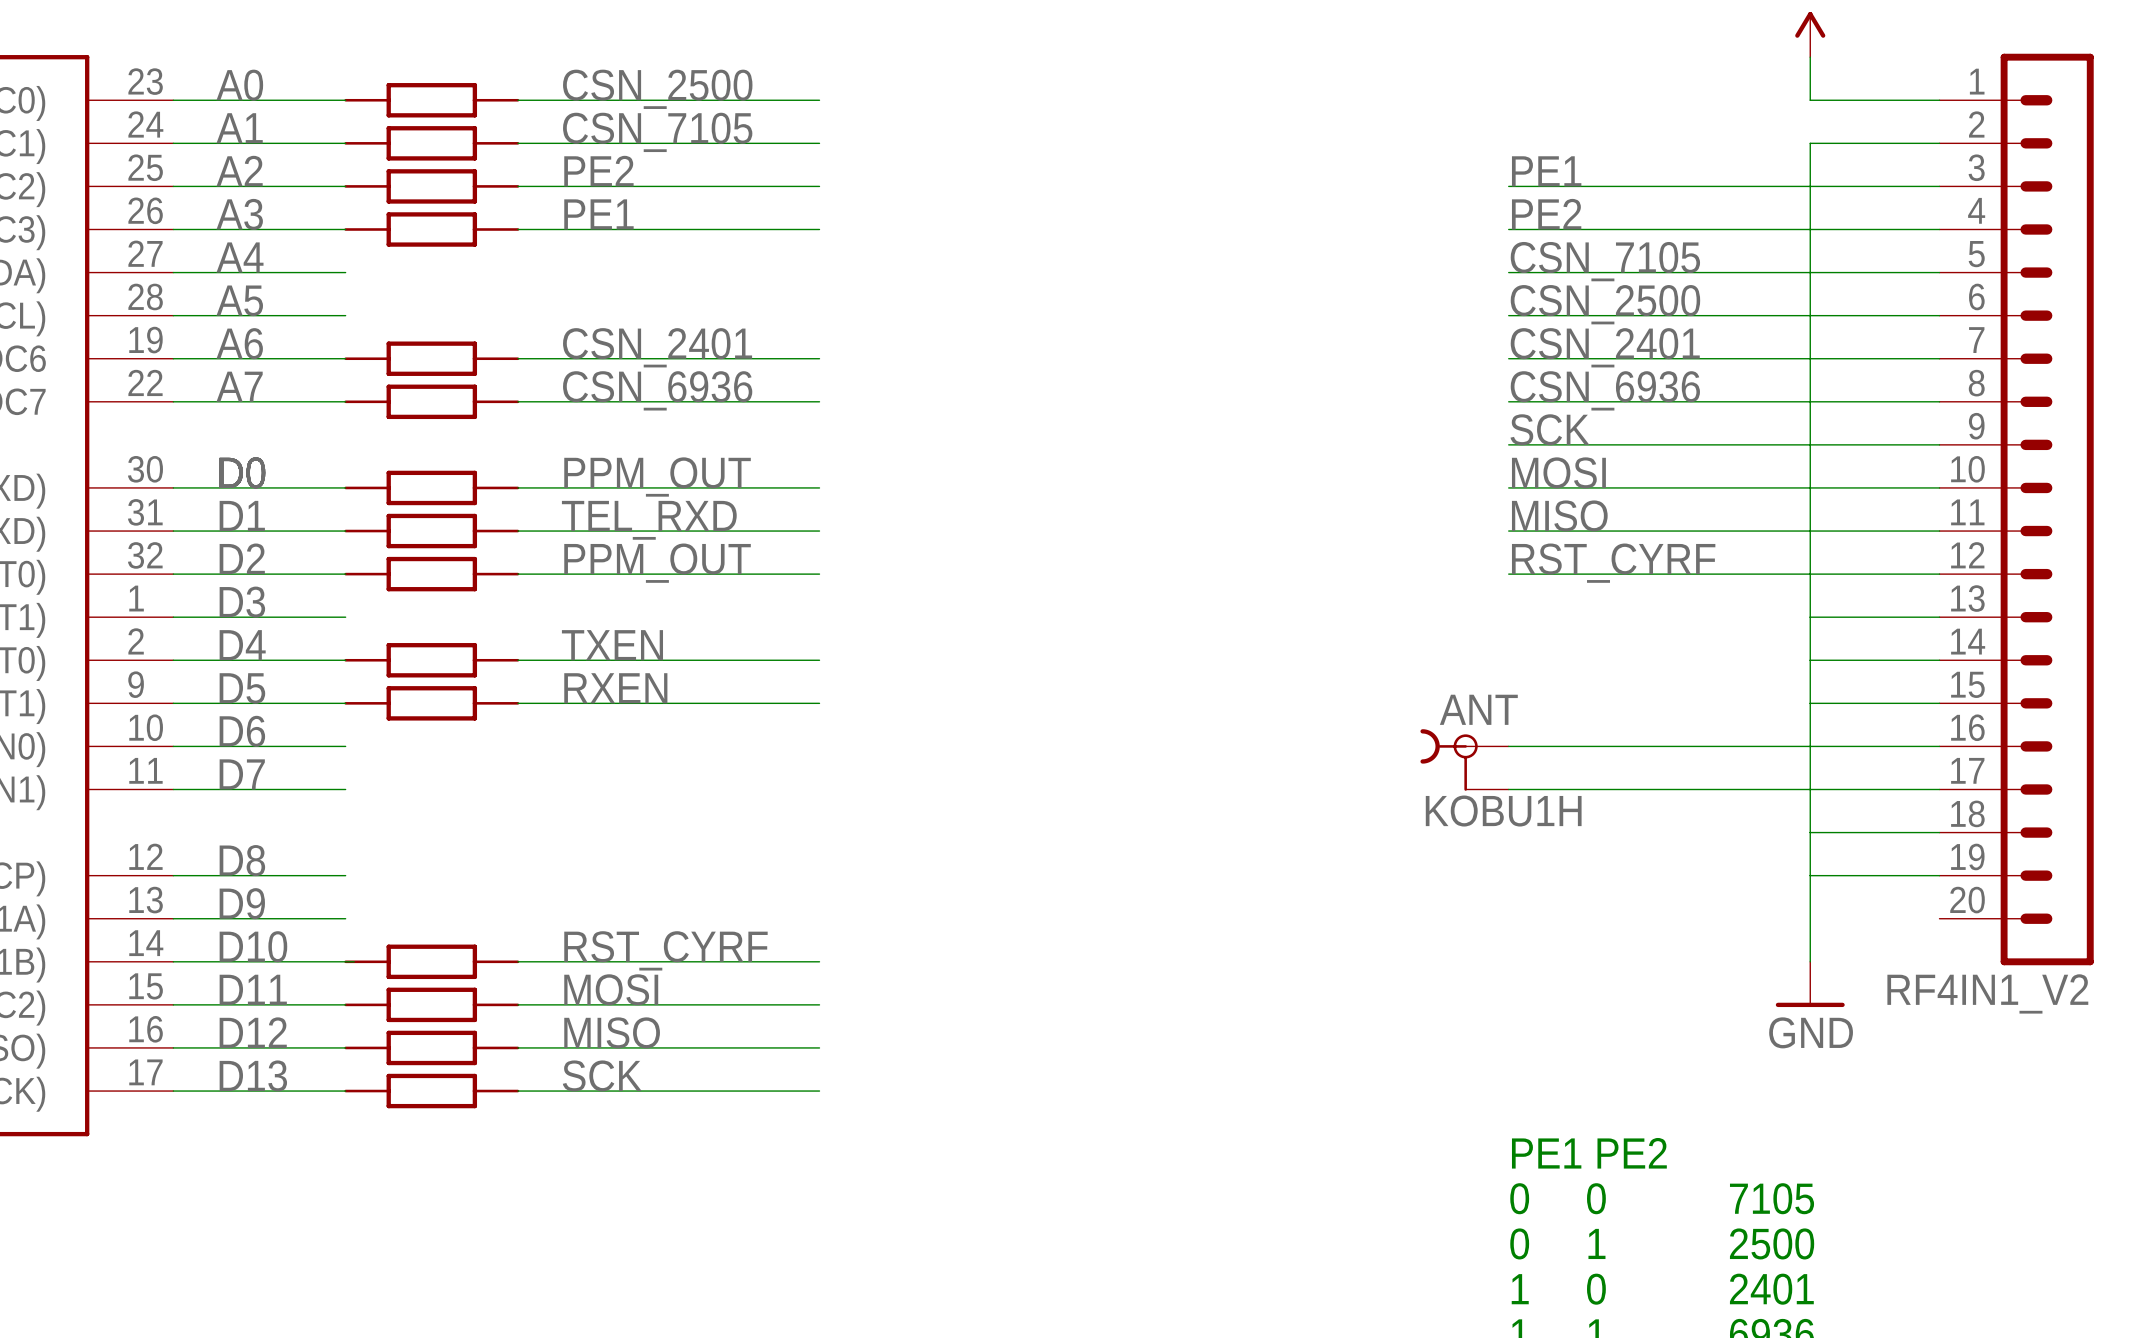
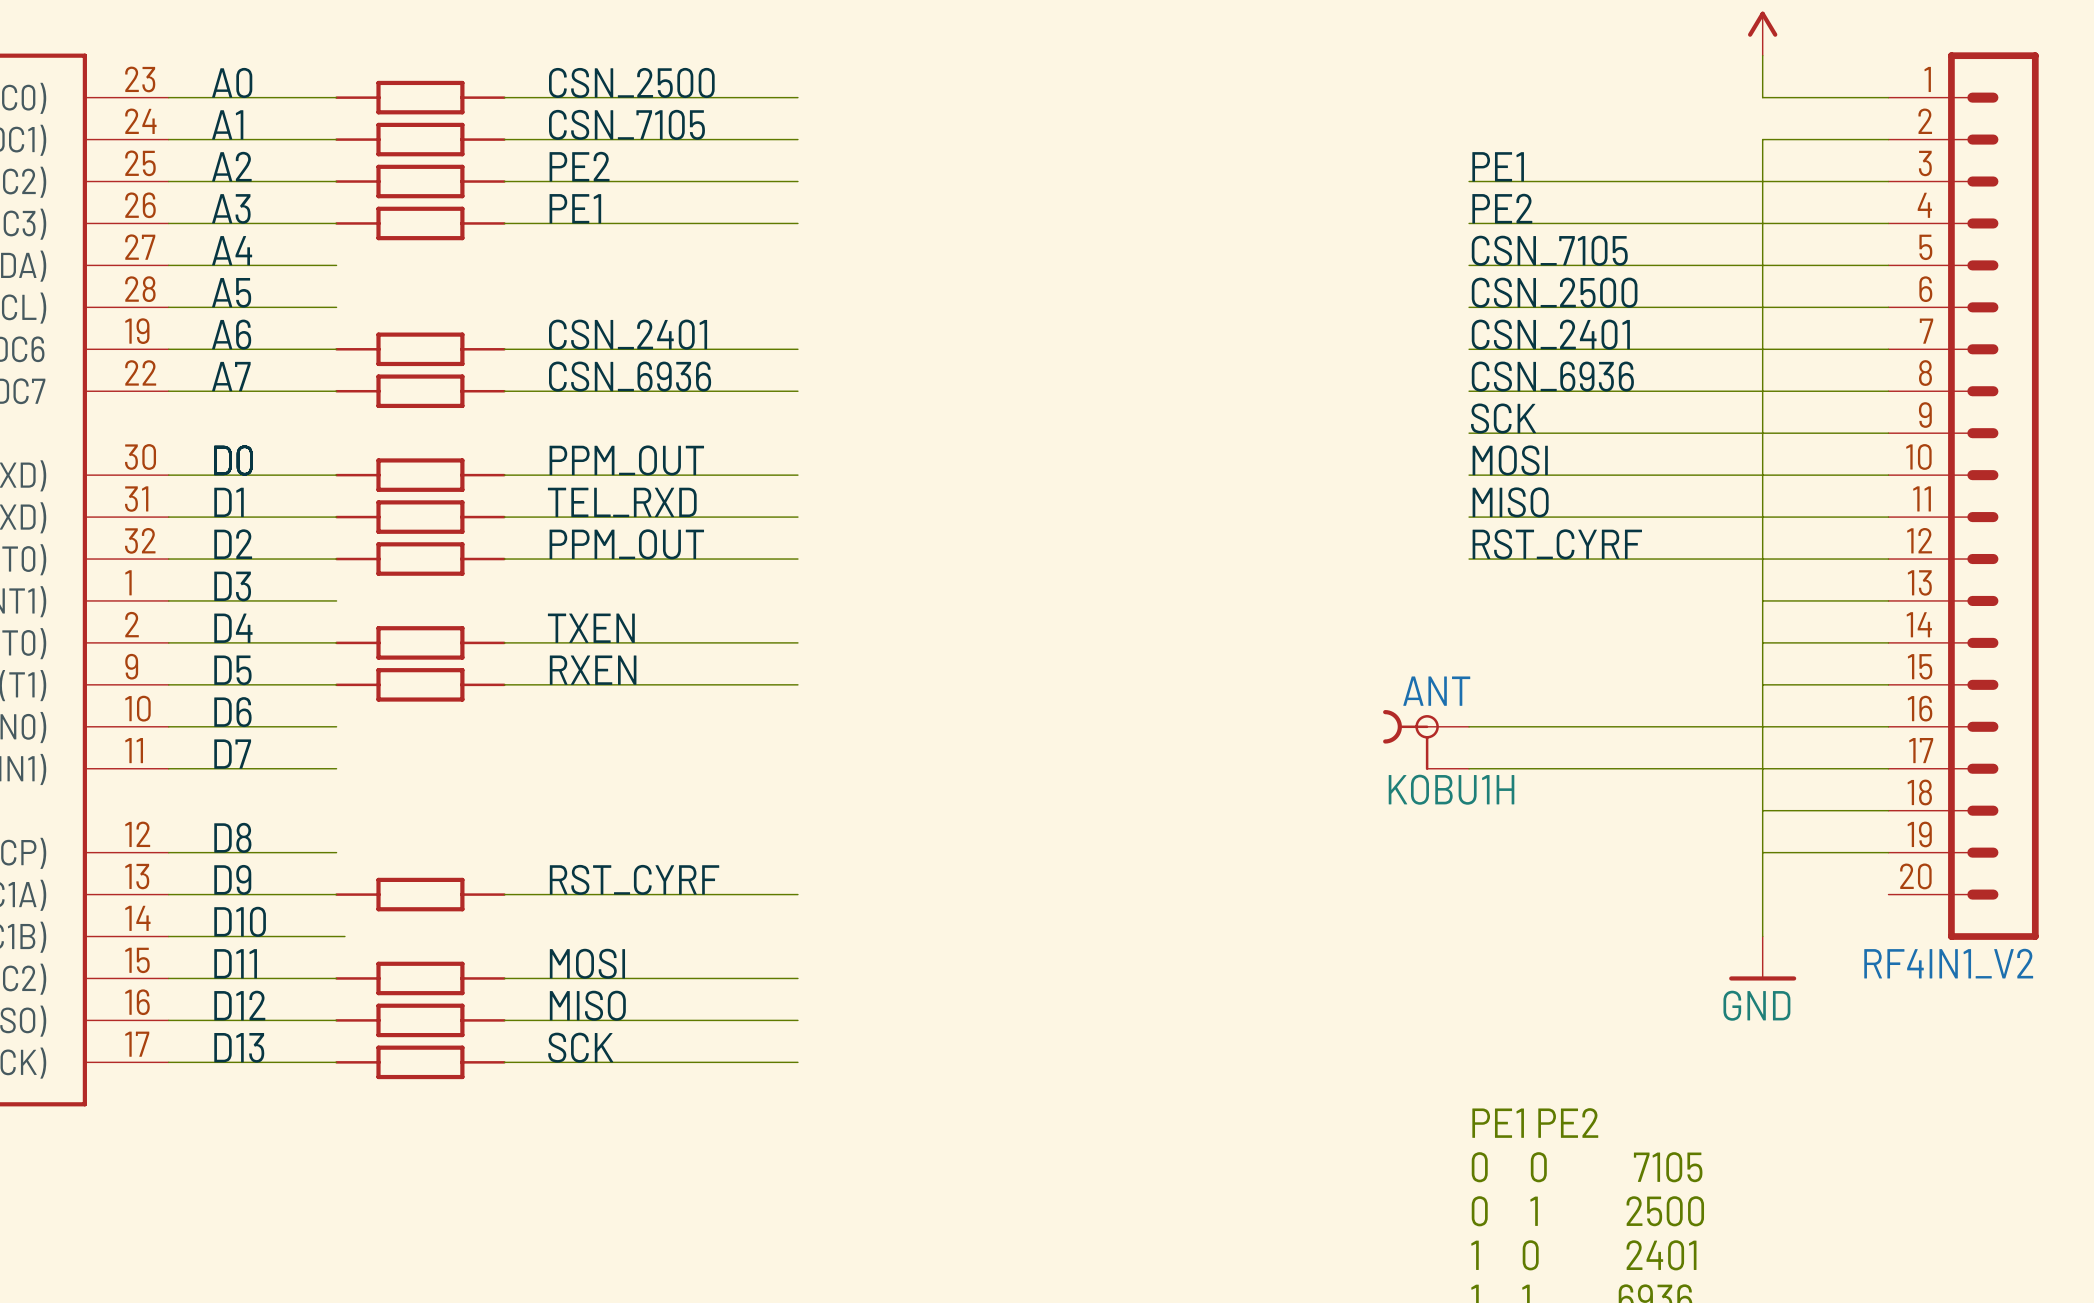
label position: RST_CYRF (665, 950) -> RST_CYRF (634, 879)
part position: (431, 961) -> (420, 894)
wire: (517, 961) (819, 961) -> (504, 894) (797, 894)

